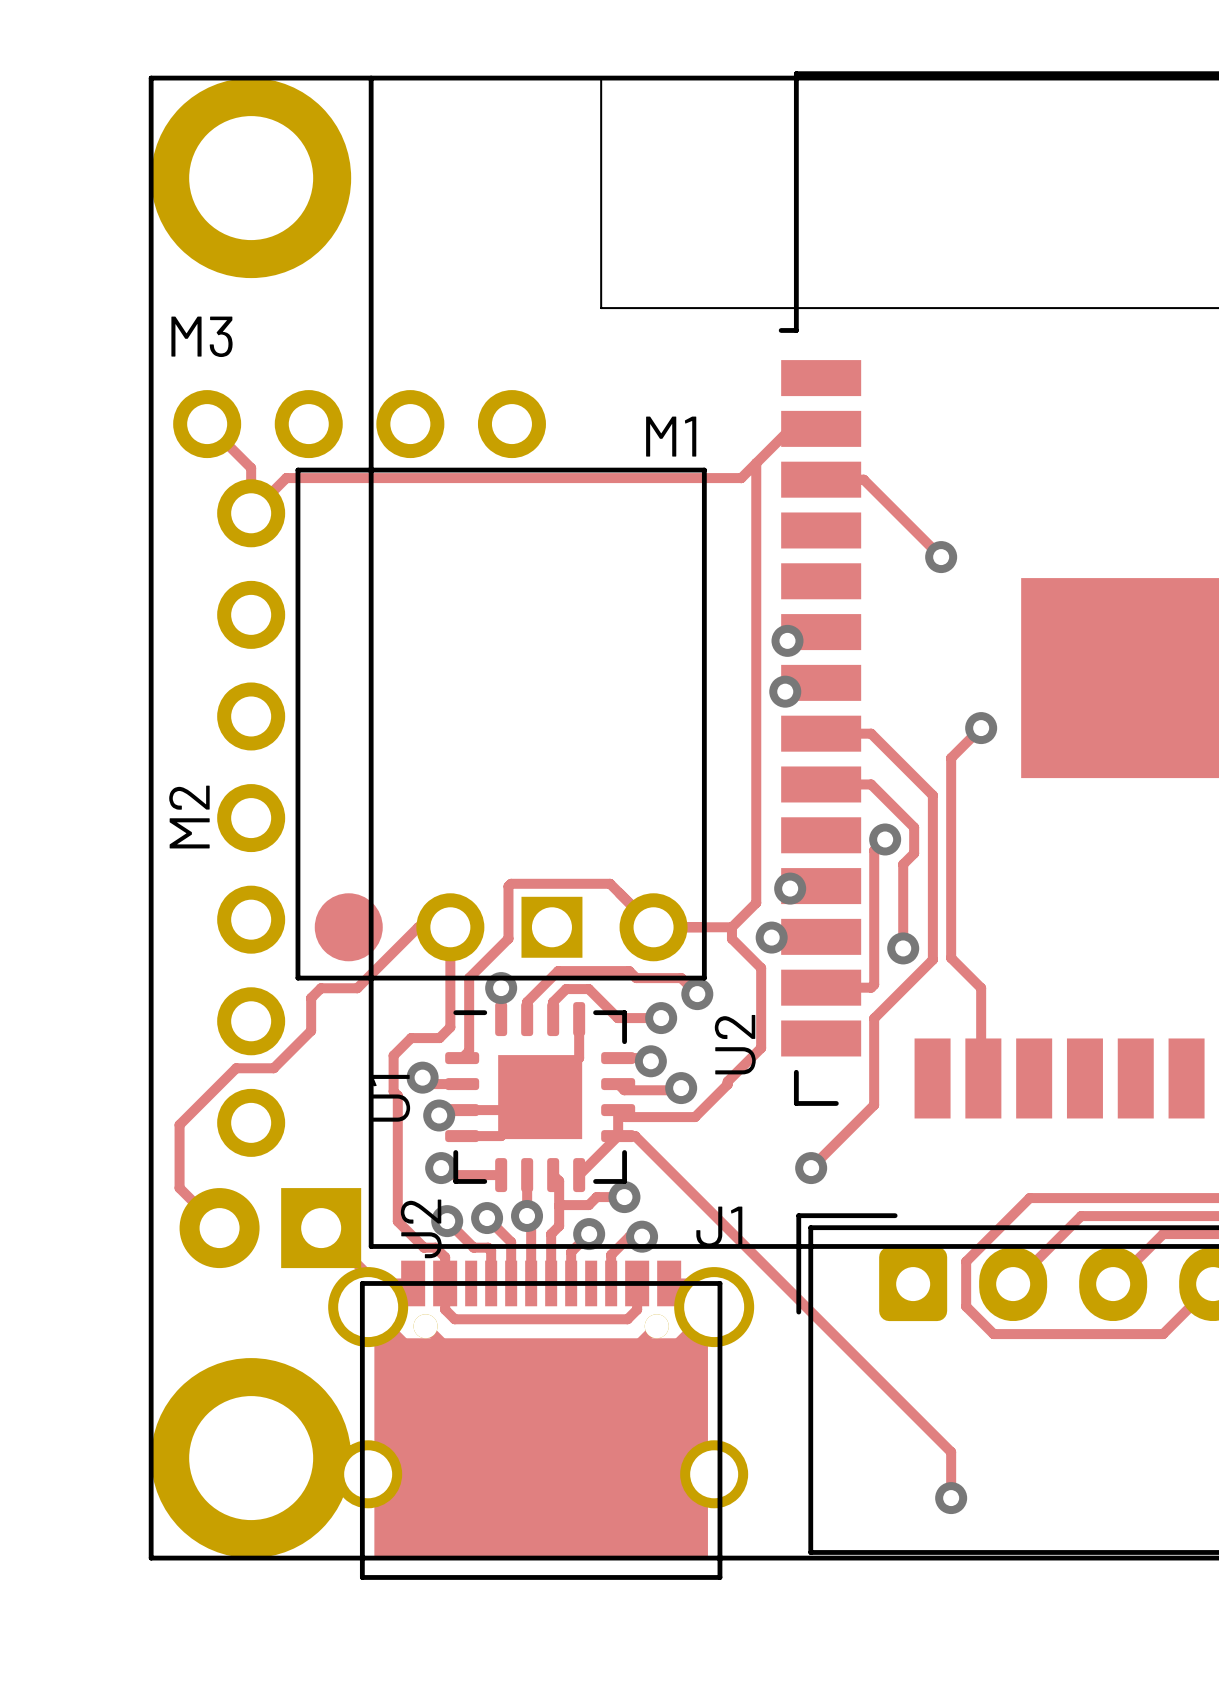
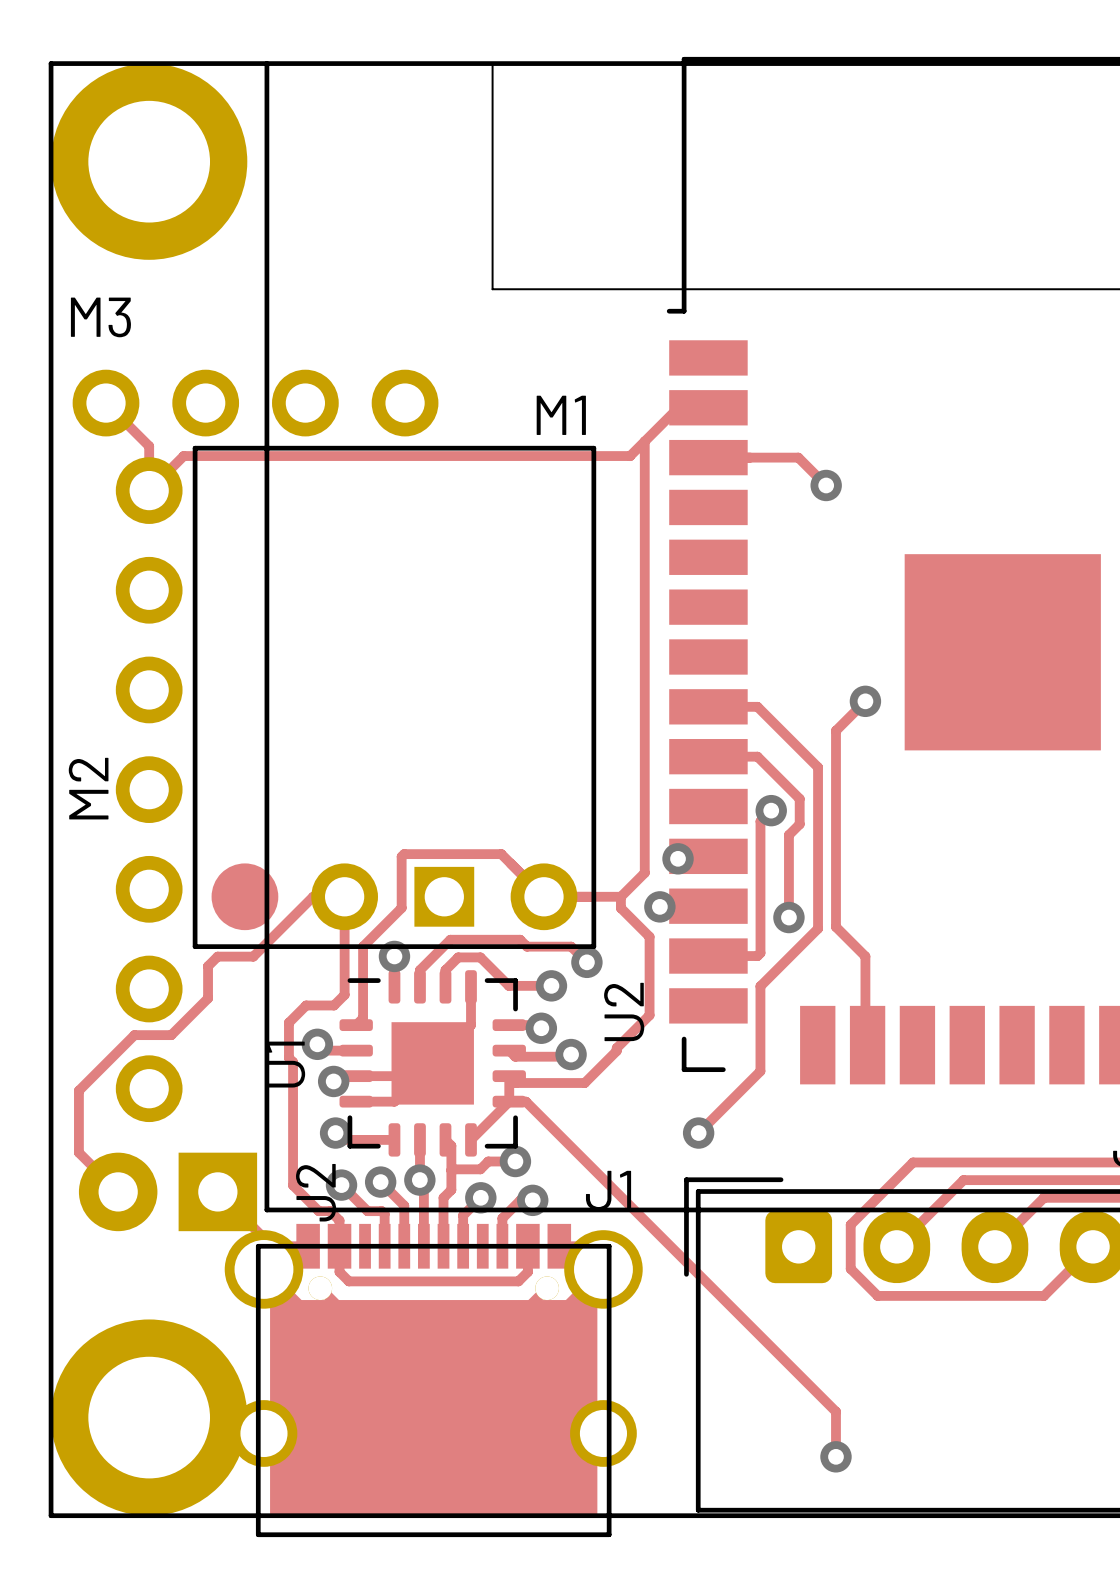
track: (863, 479) (941, 557) -> (750, 457) (798, 457) (826, 485)
via position: (941, 557) -> (826, 485)
via: (787, 640) -> none
via: (785, 691) -> none

